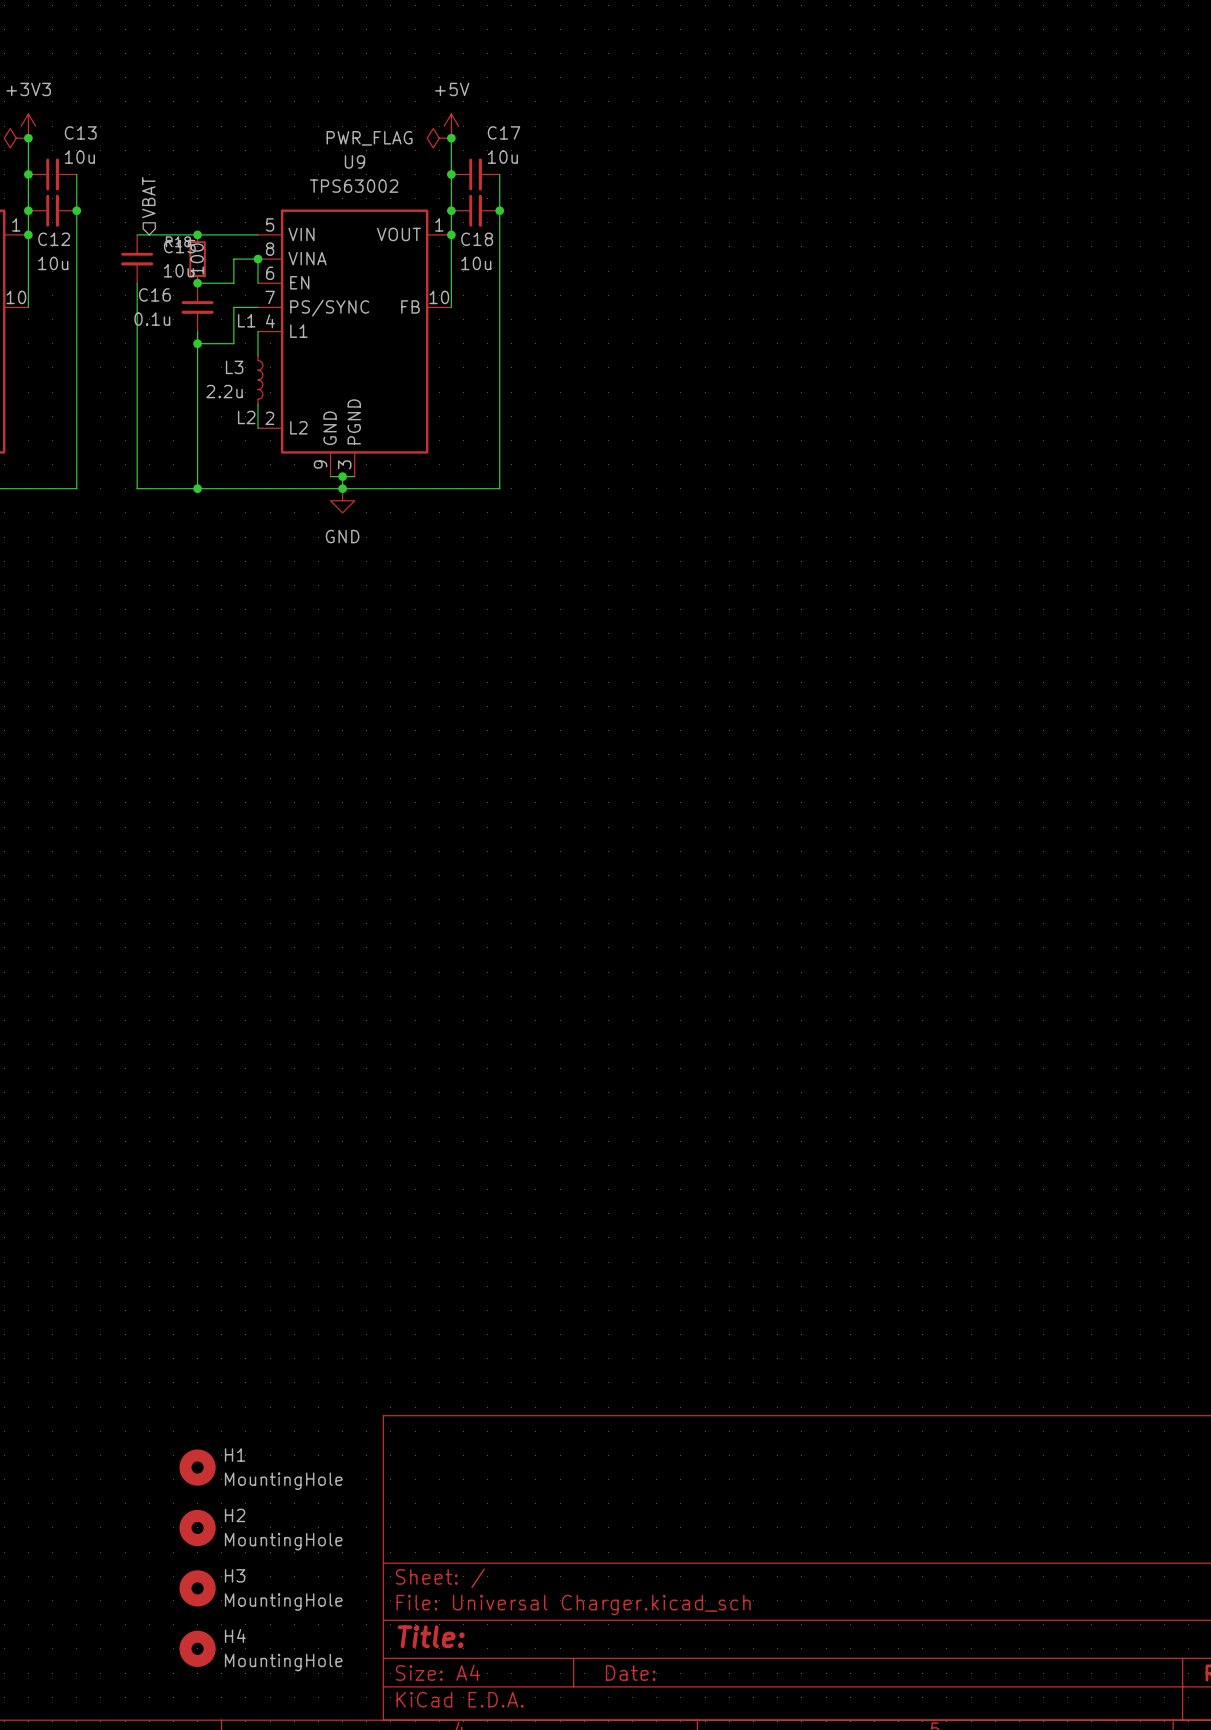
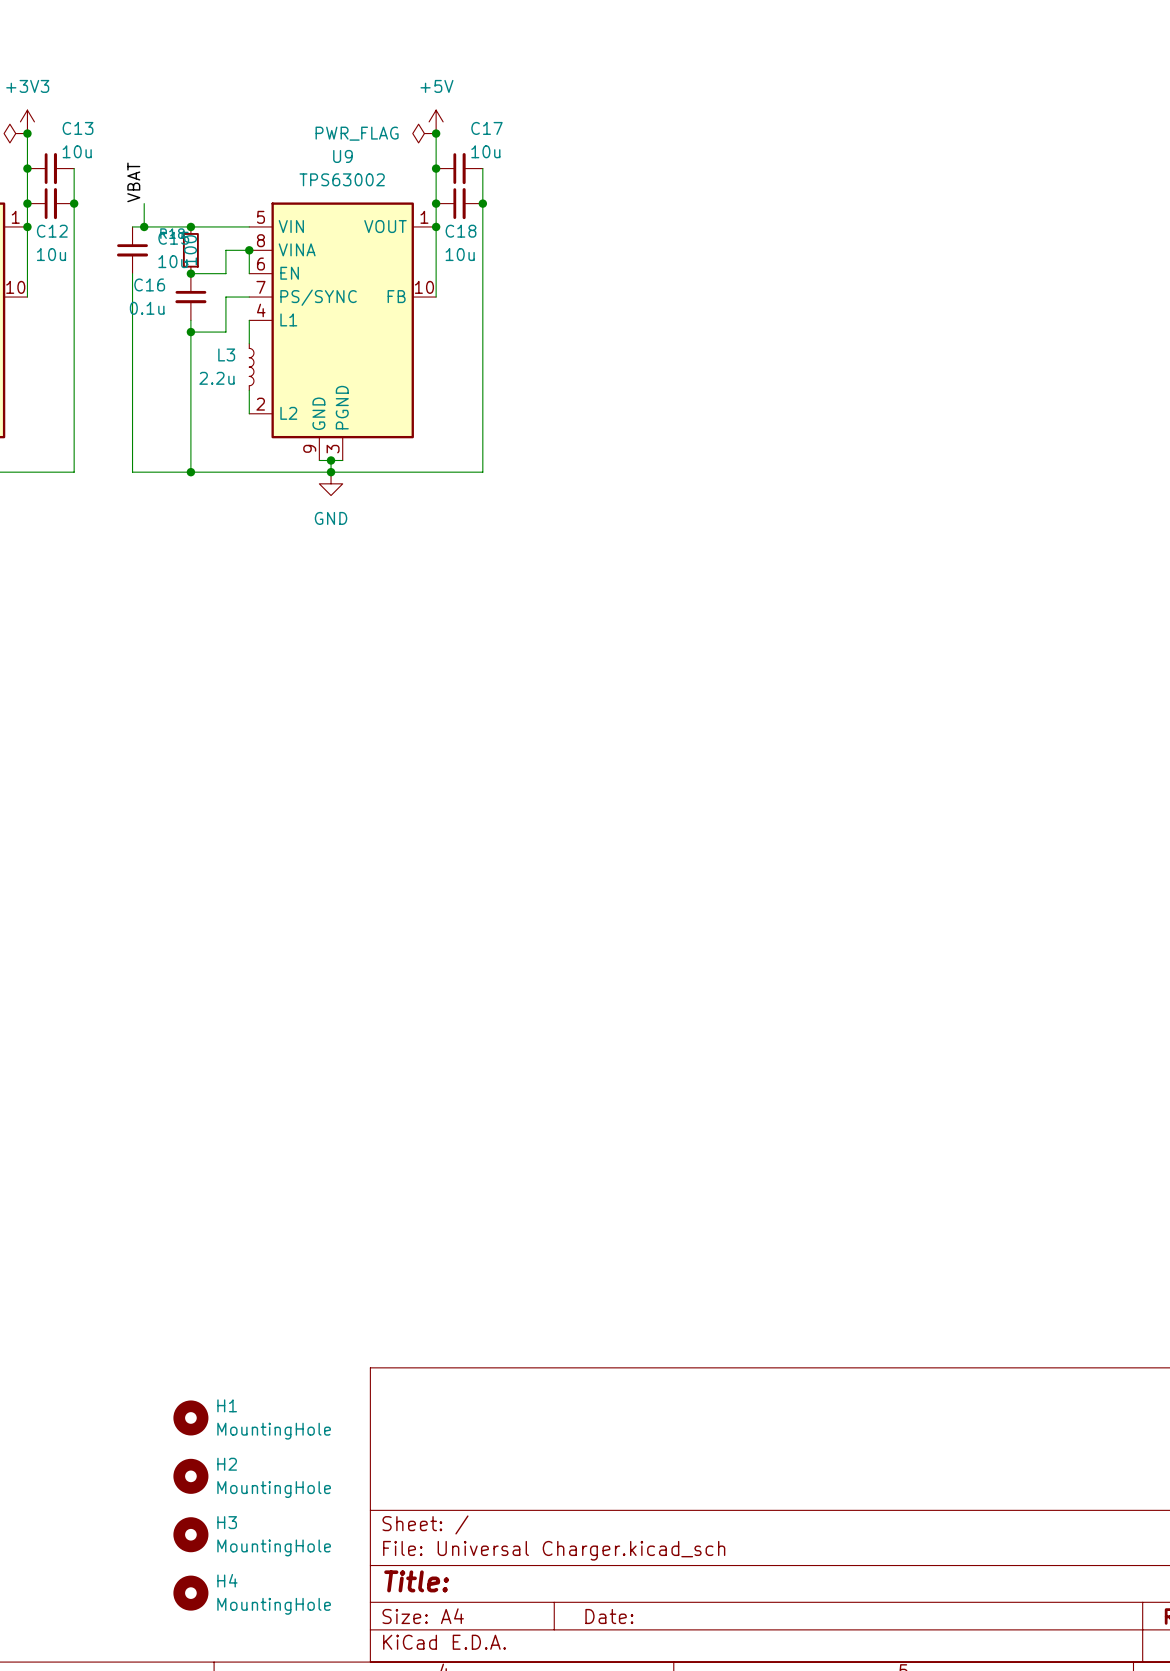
label: none -> VBAT (133, 182)
hierarchical label: VBAT (148, 197) -> none
wire: none -> (144, 203) (144, 226)
junction: none -> (144, 226)
label: L1 (246, 320) -> none
label: L2 (246, 417) -> none

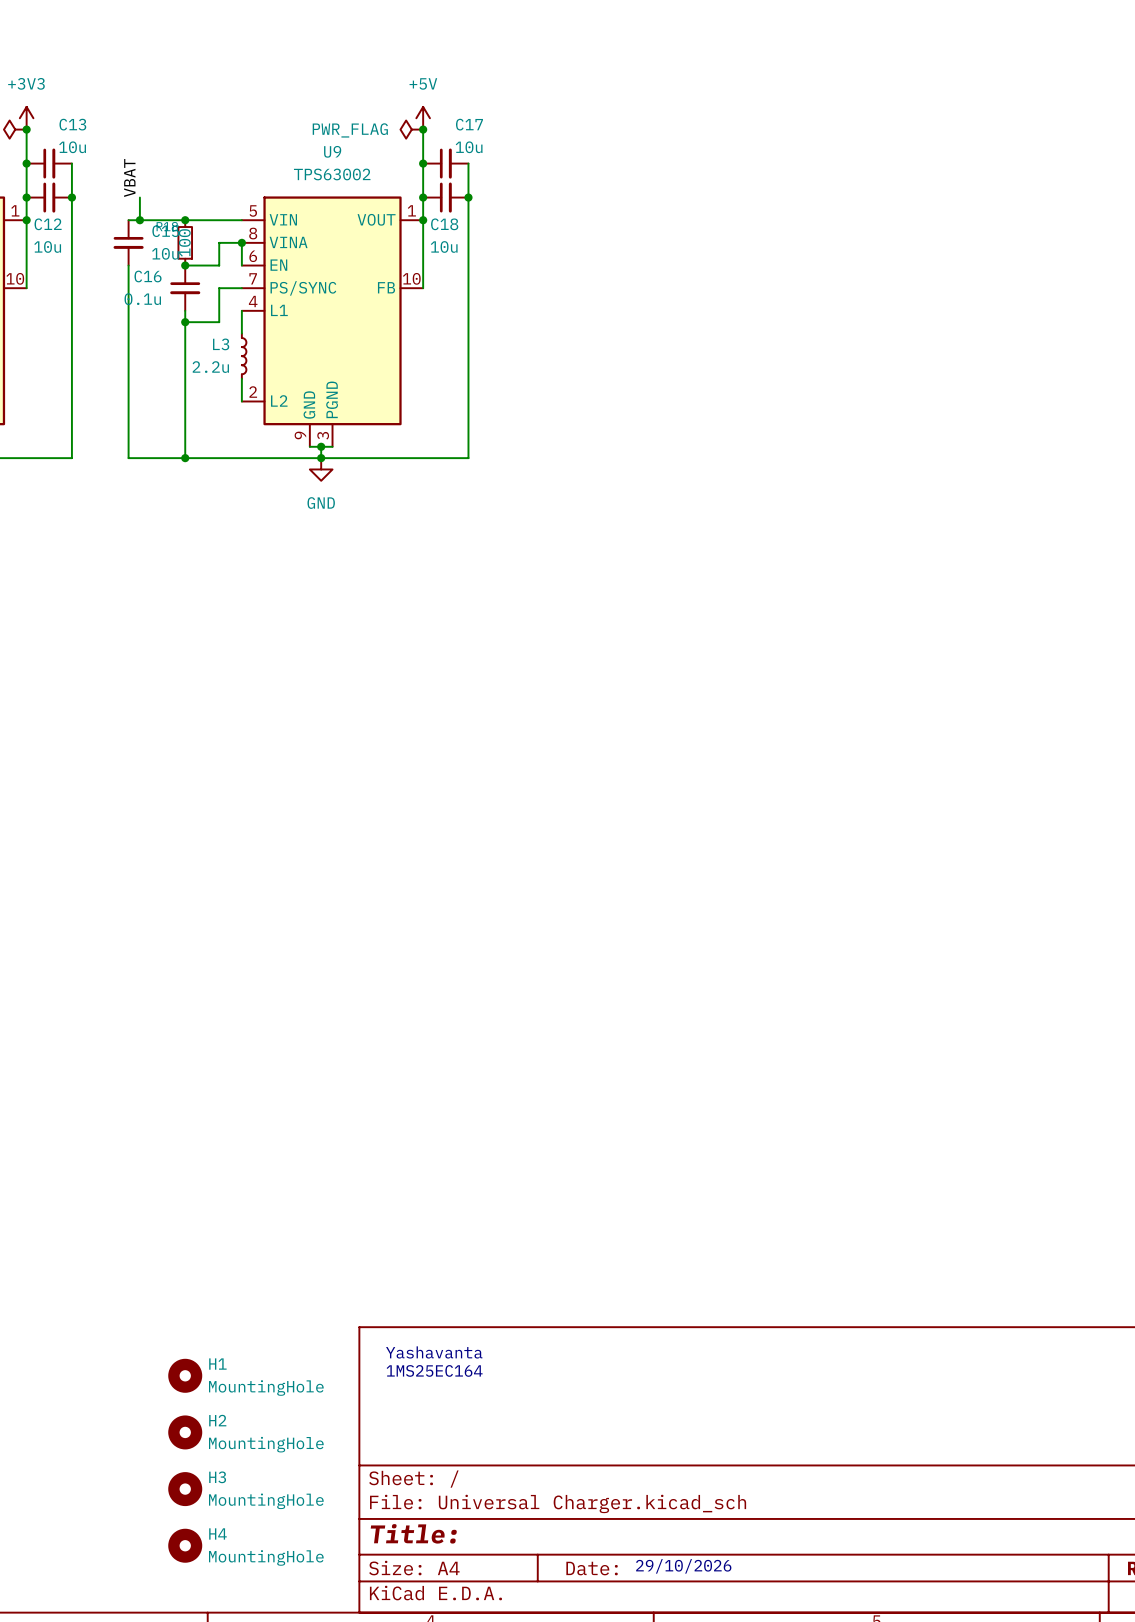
text: none -> Yashavanta (434, 1352)
text: none -> 1MS25EC164 (434, 1370)
text: none -> 29/10/2026 (683, 1566)

